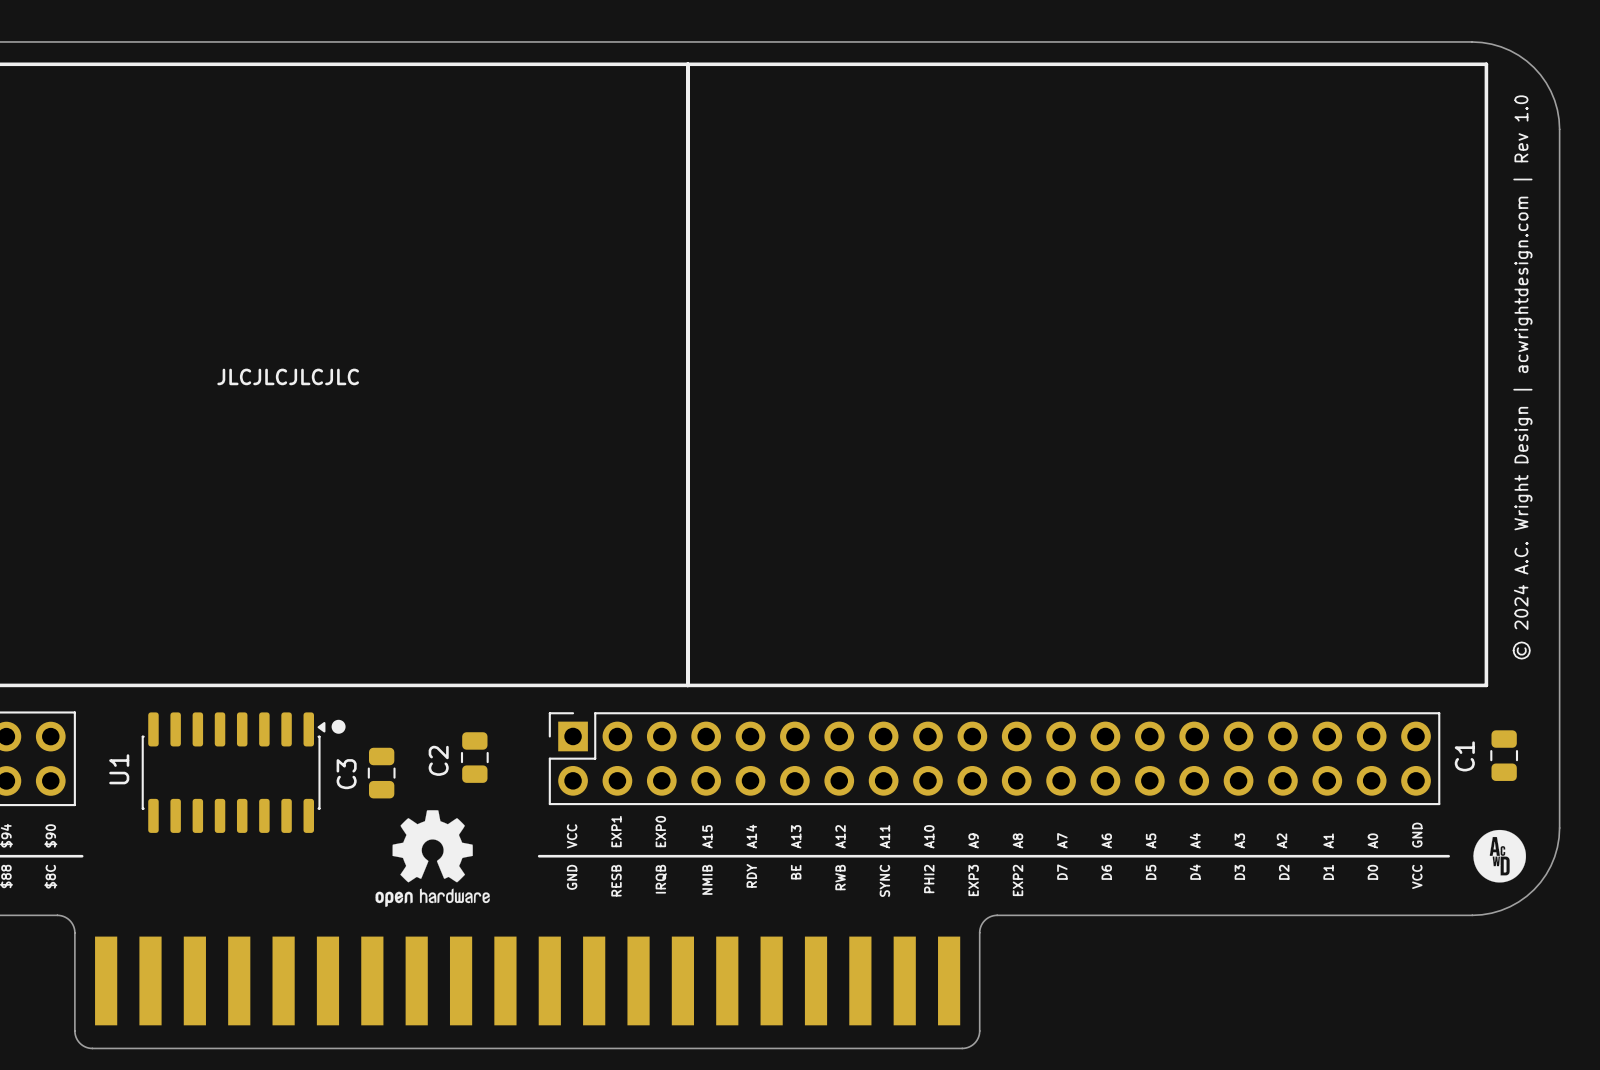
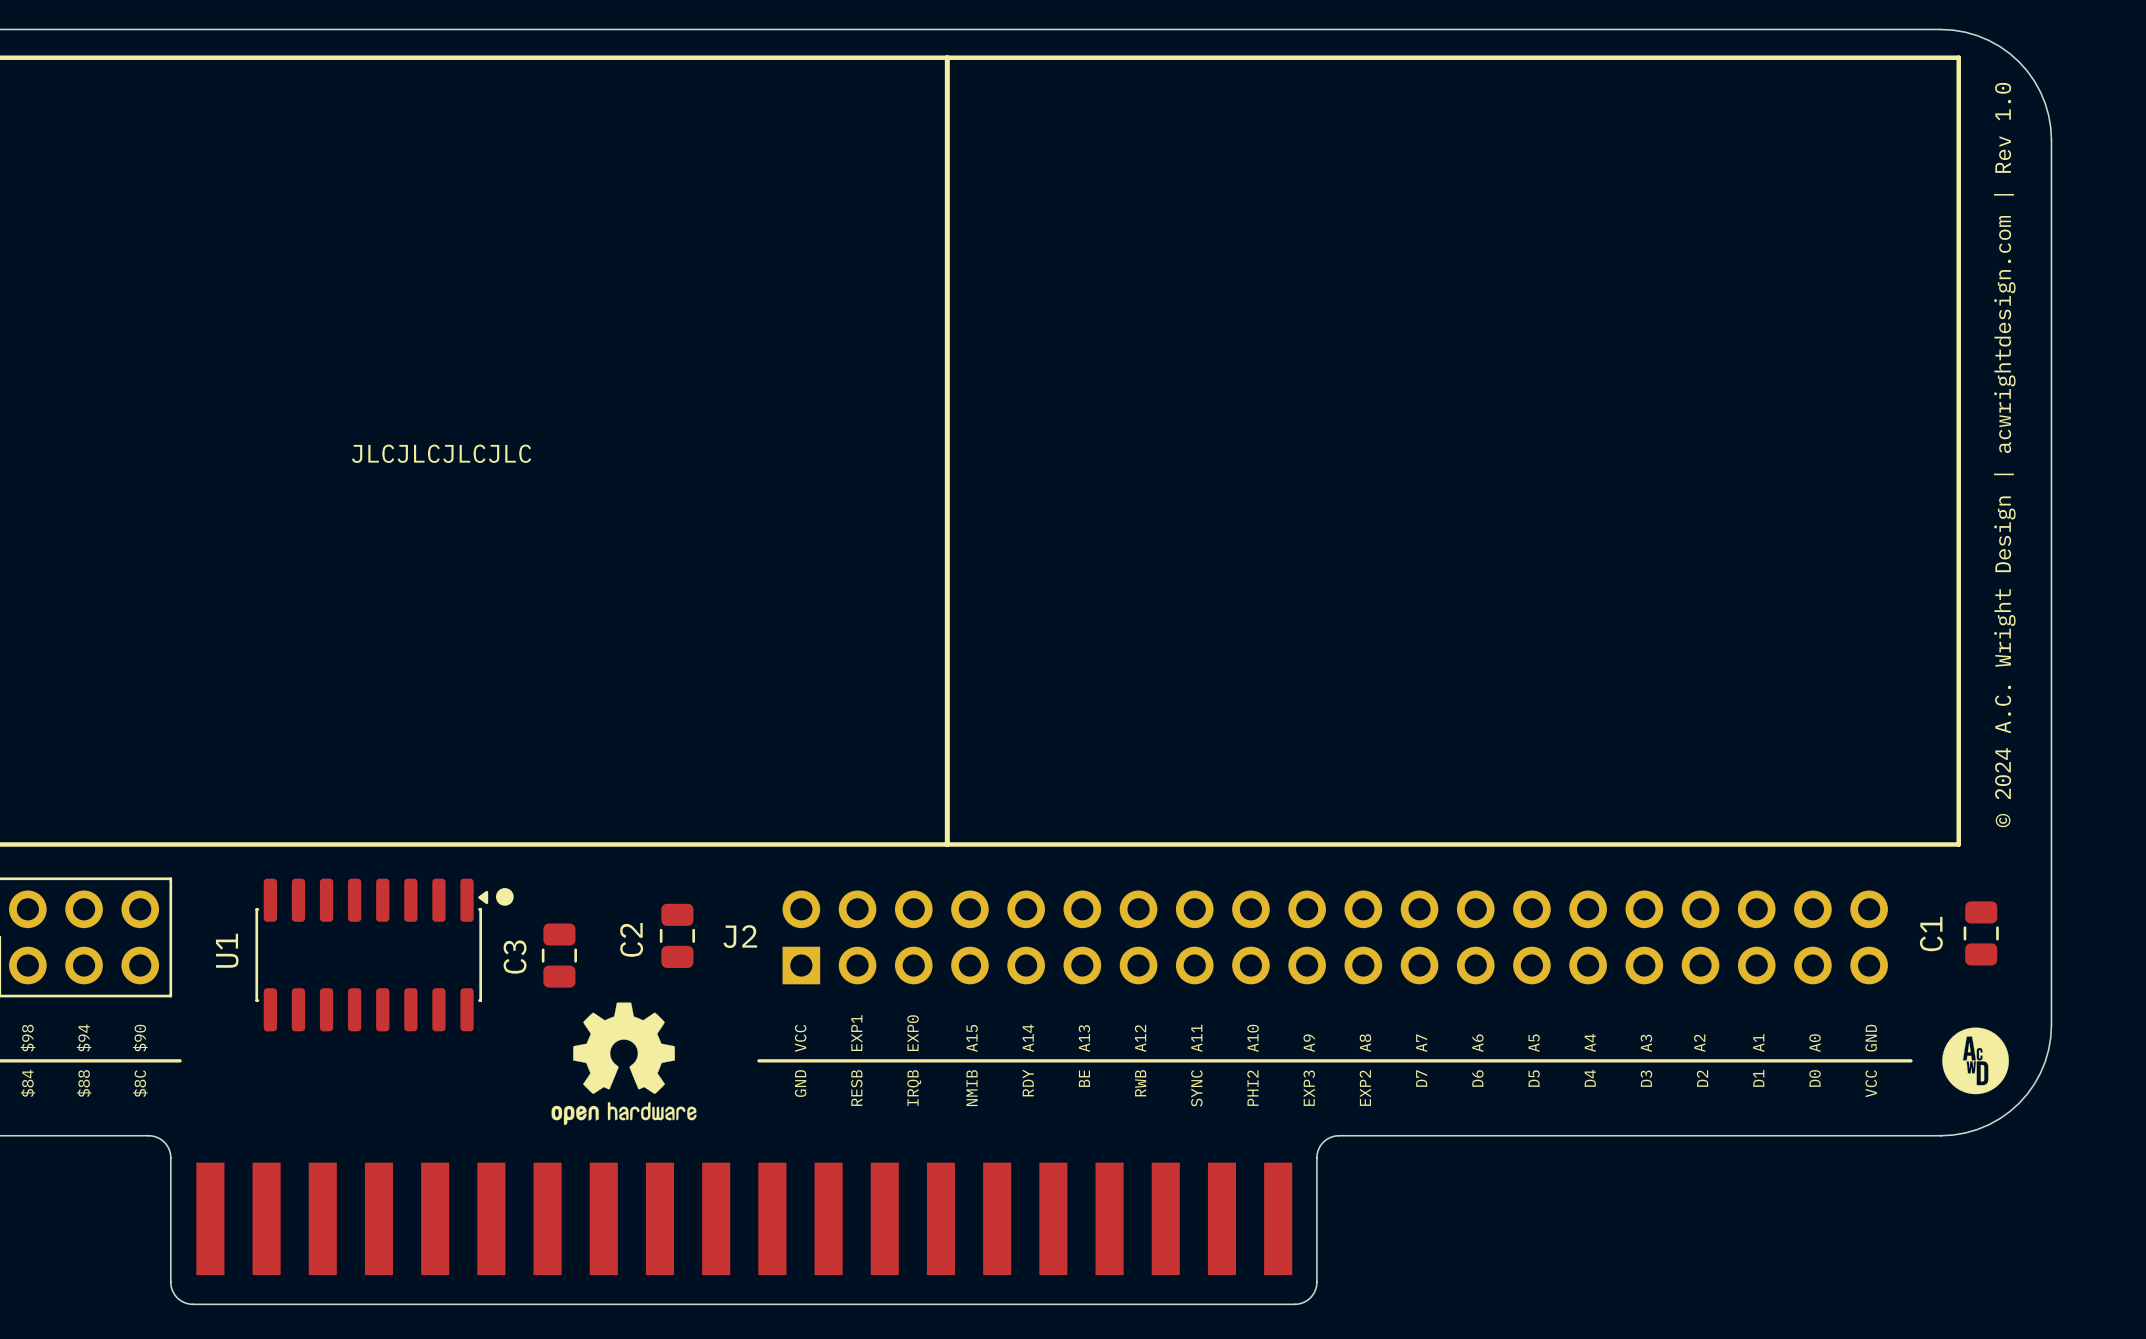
J2 side: top (994, 758) -> bottom (1335, 937)

